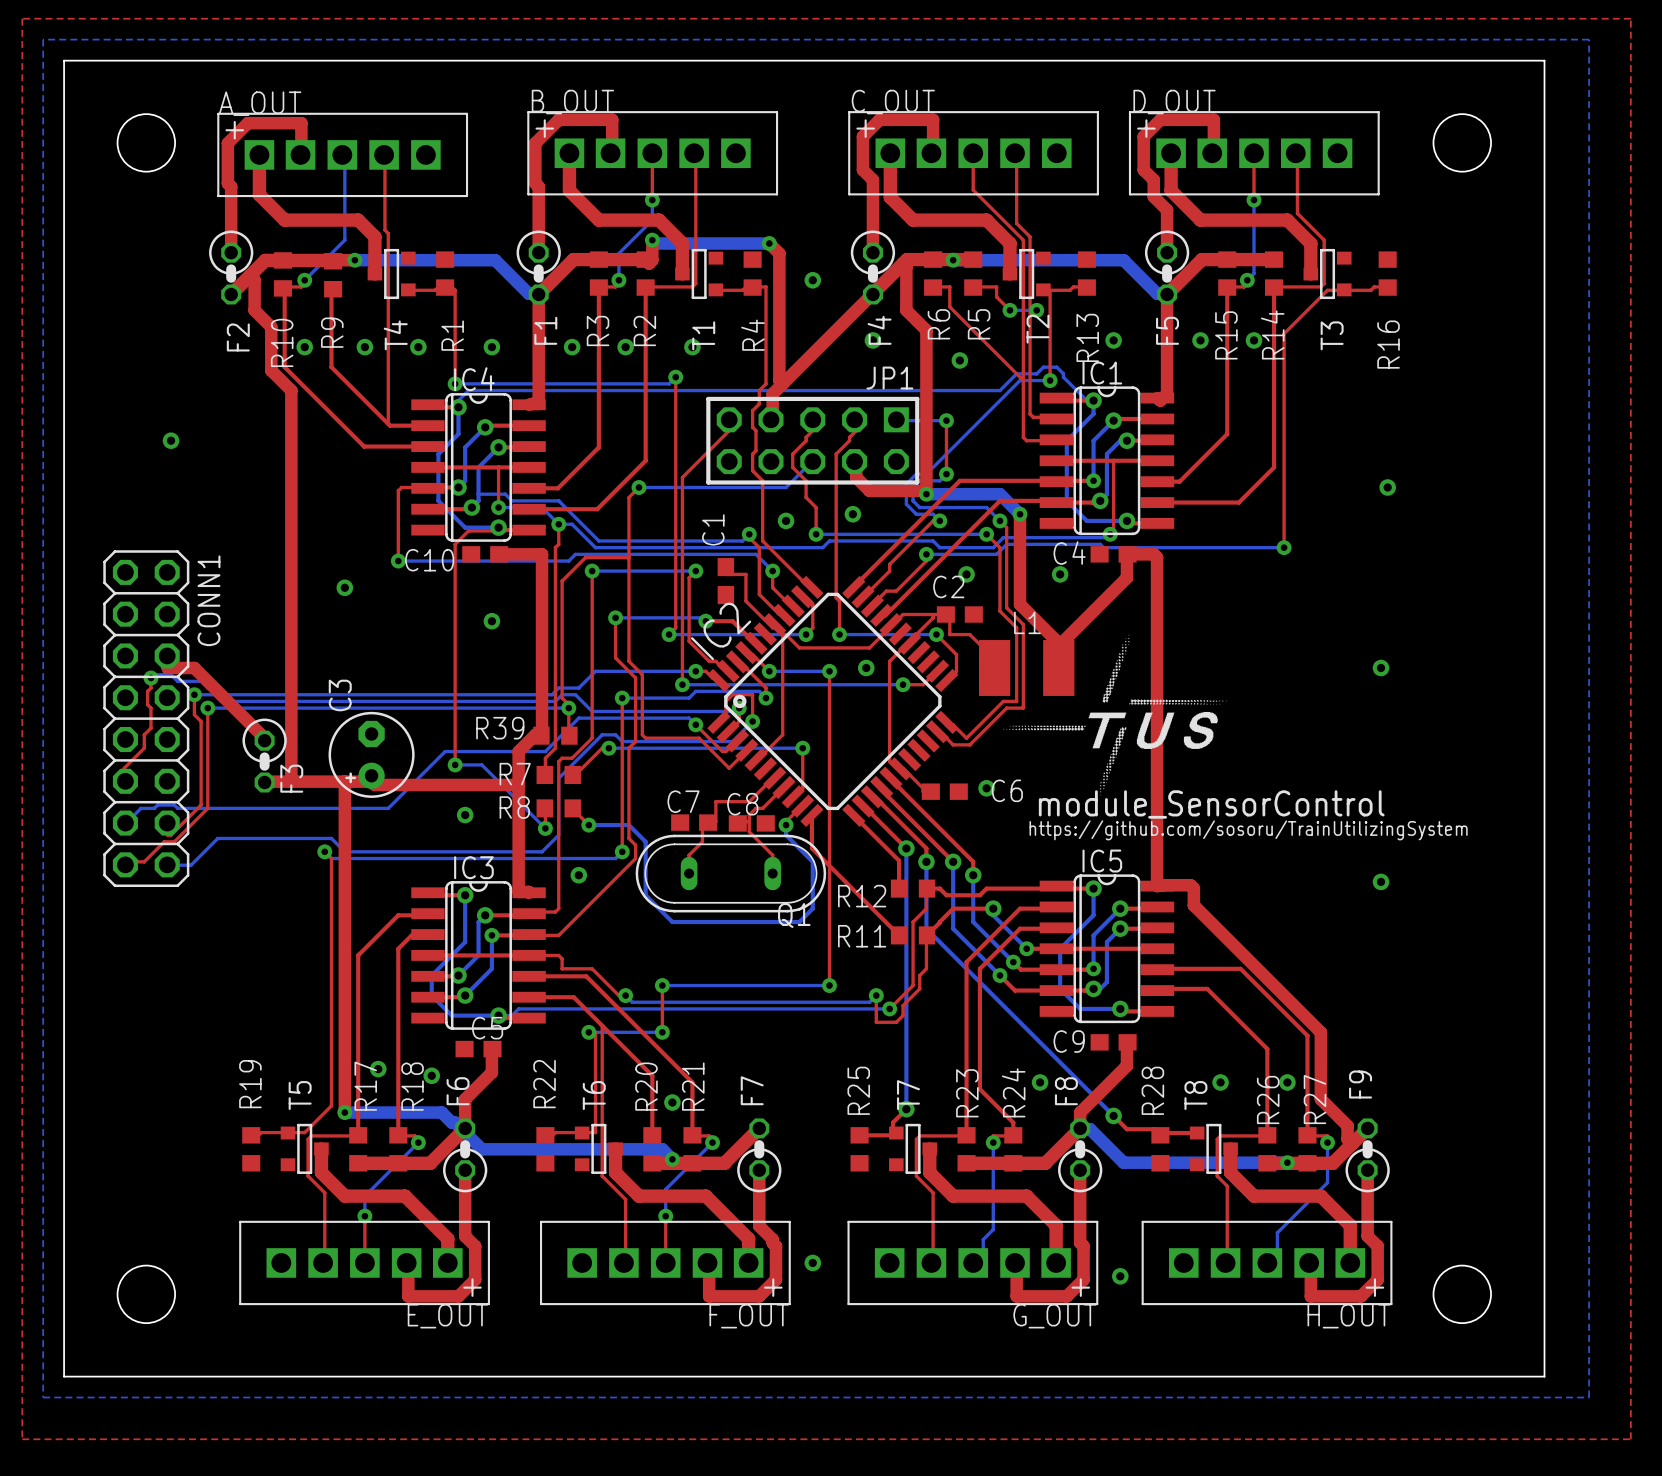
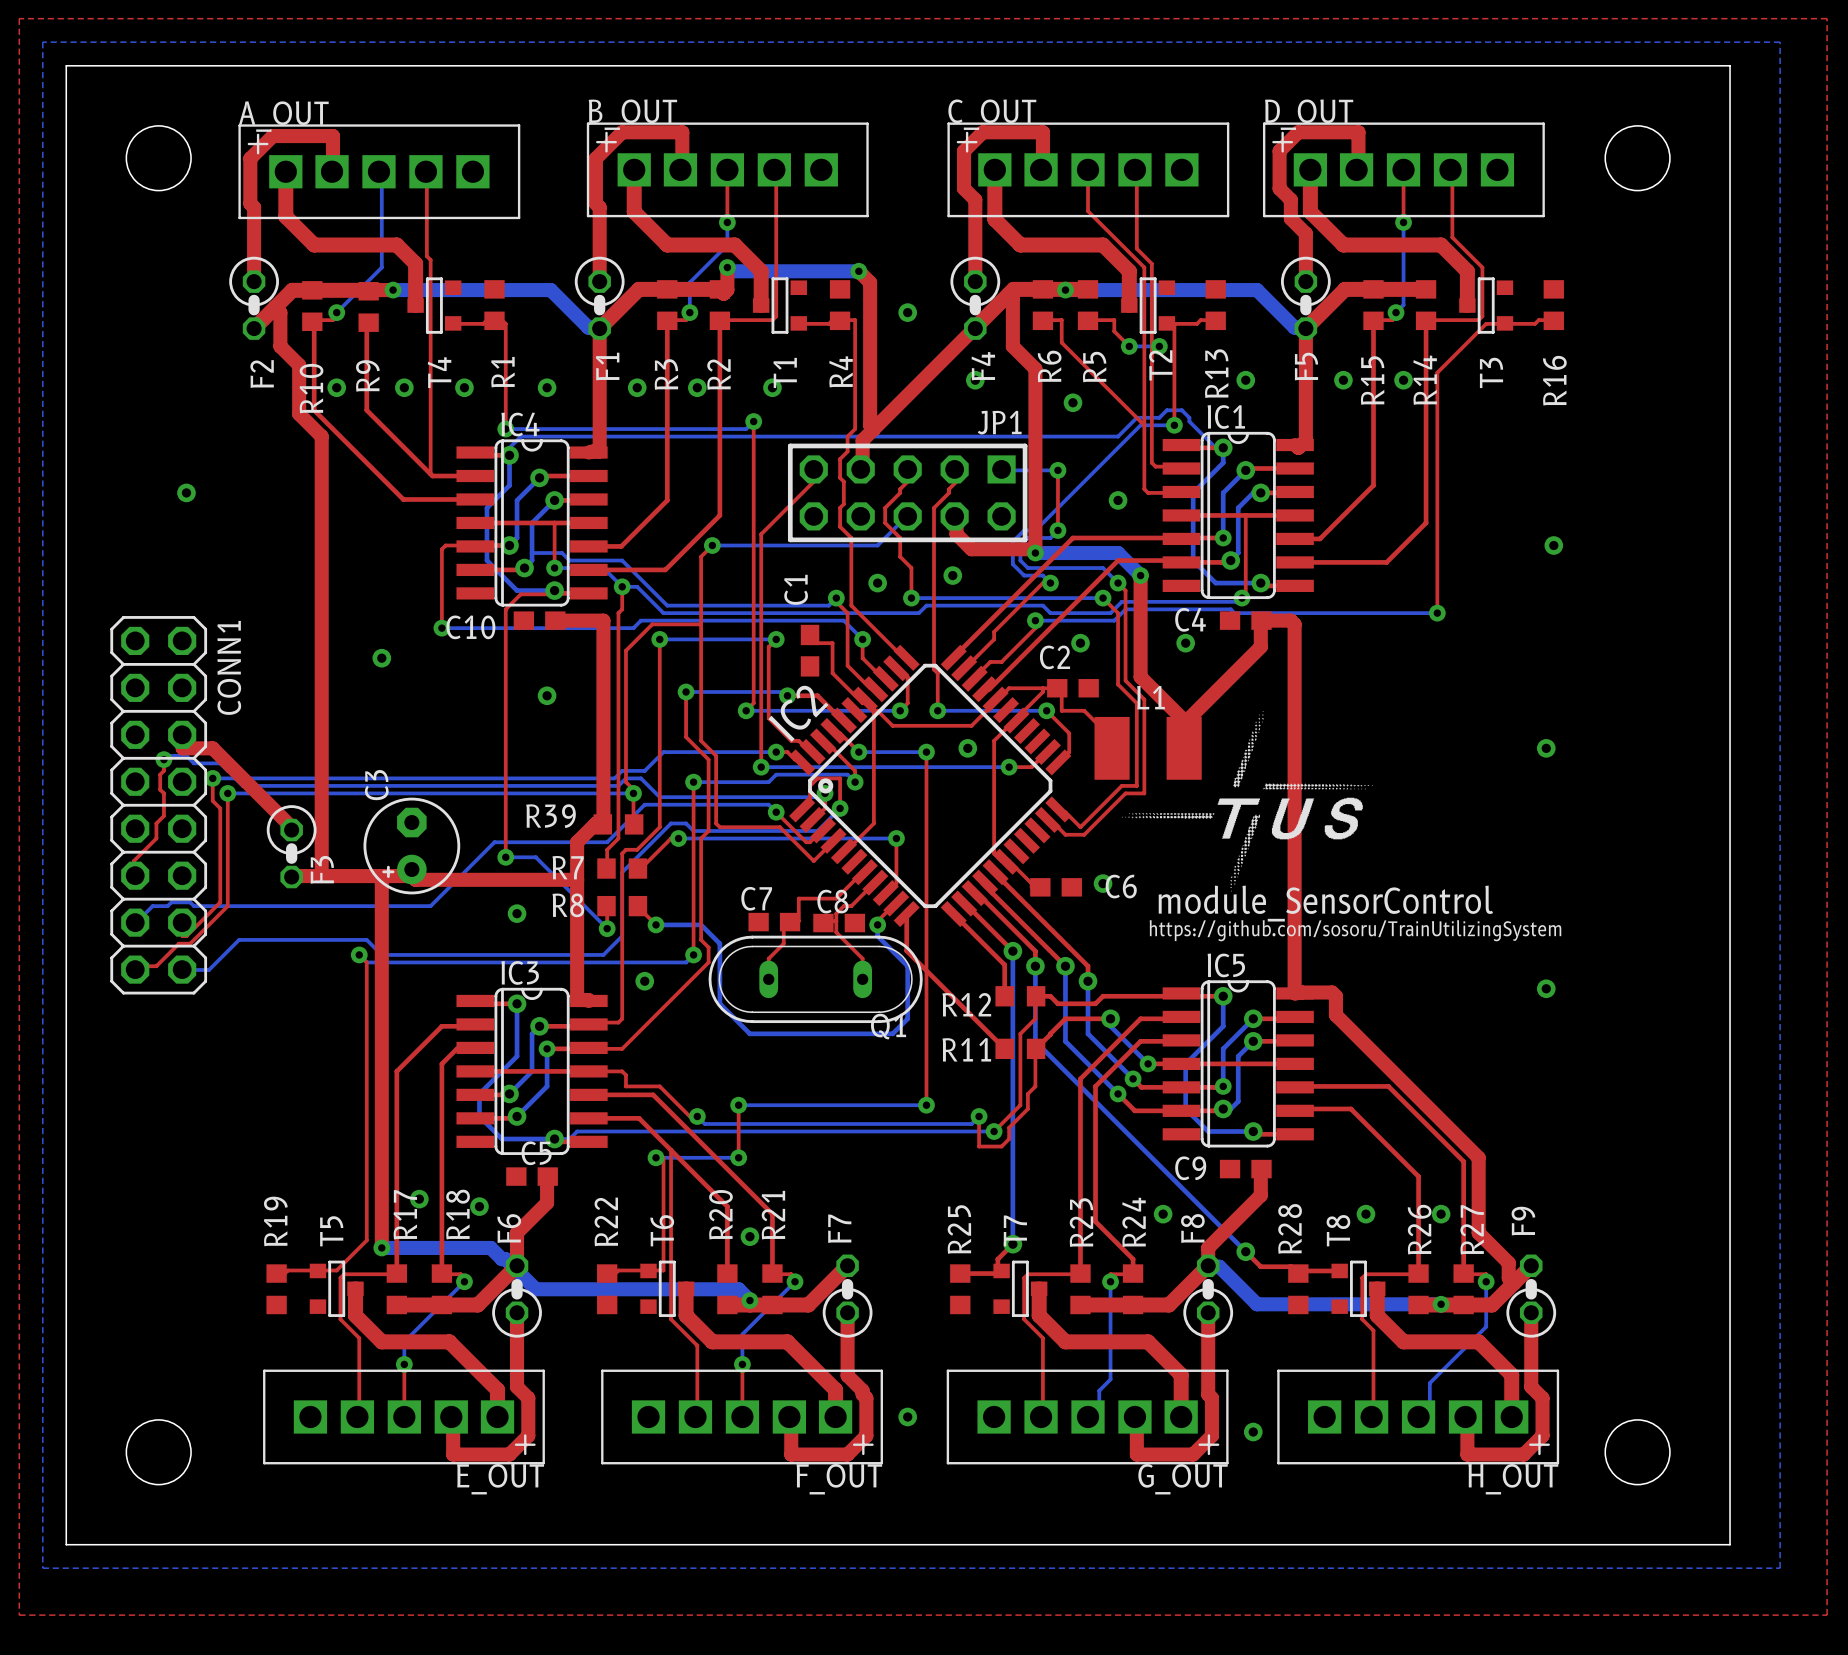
via: none -> (1118, 500)

